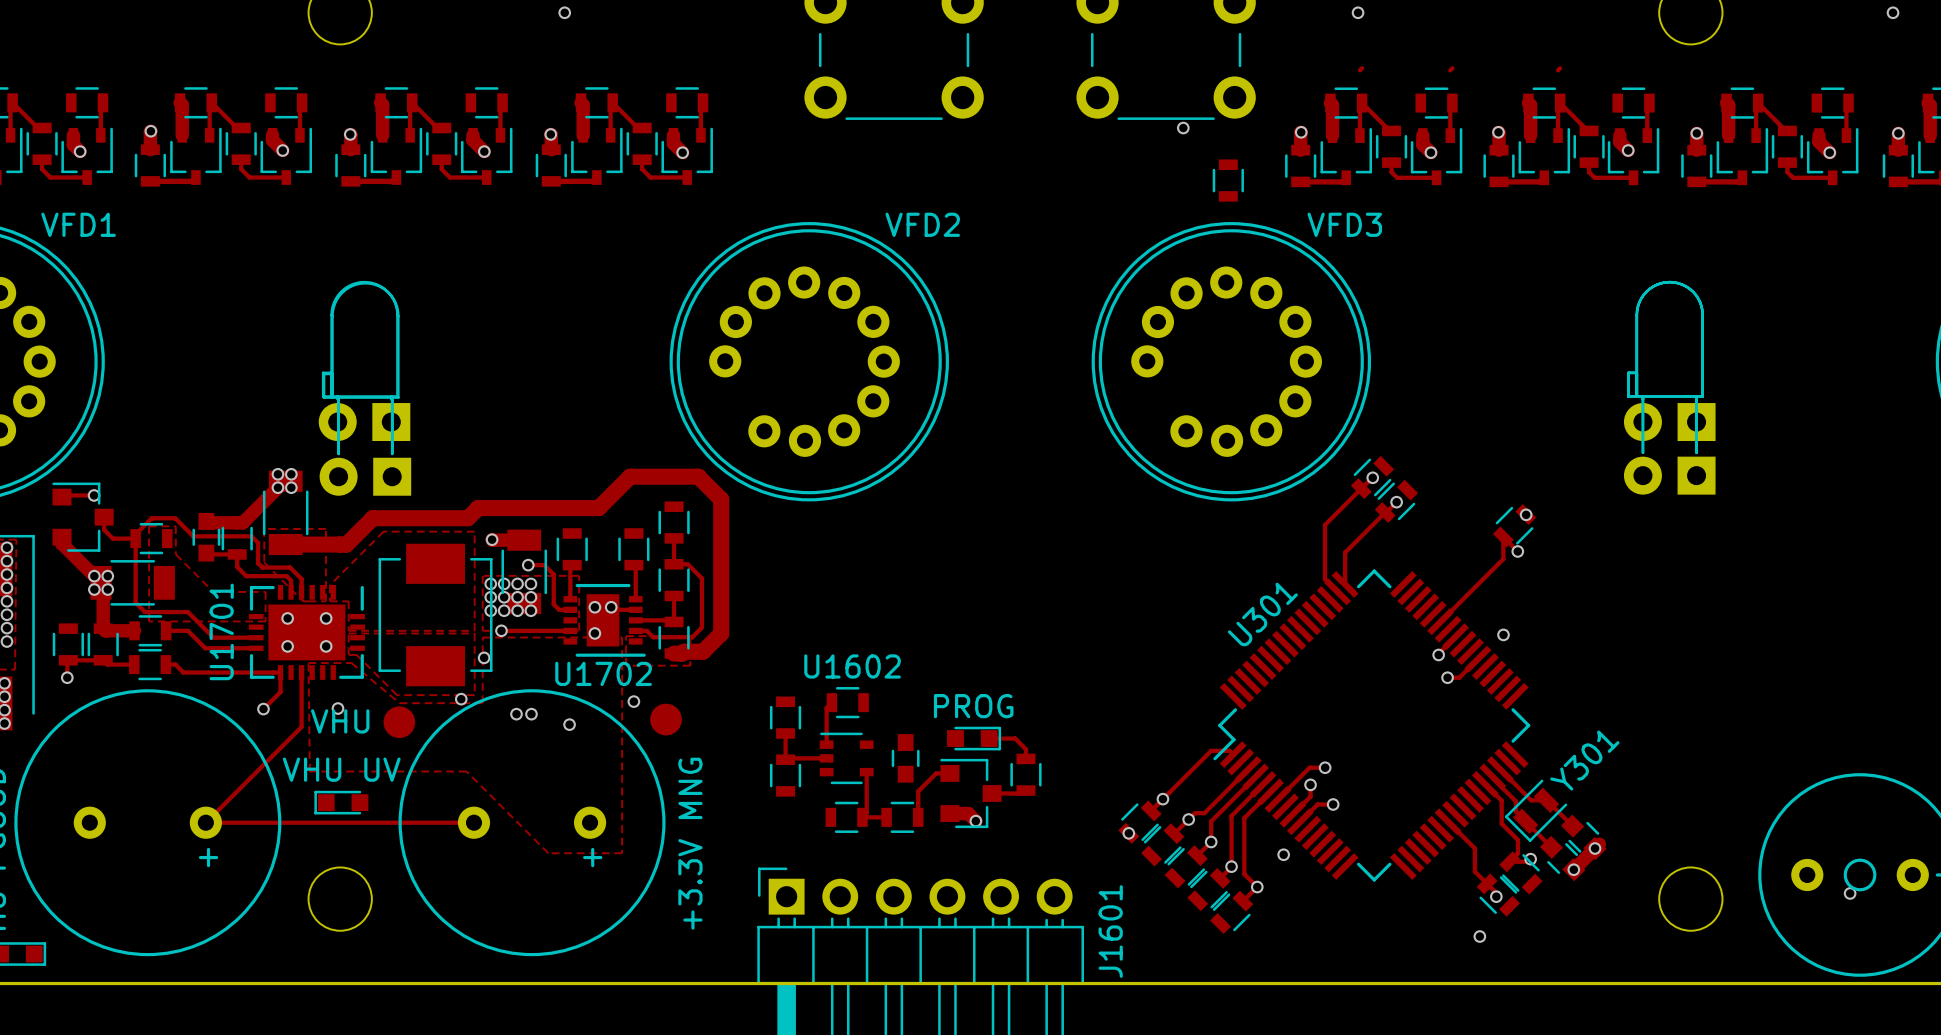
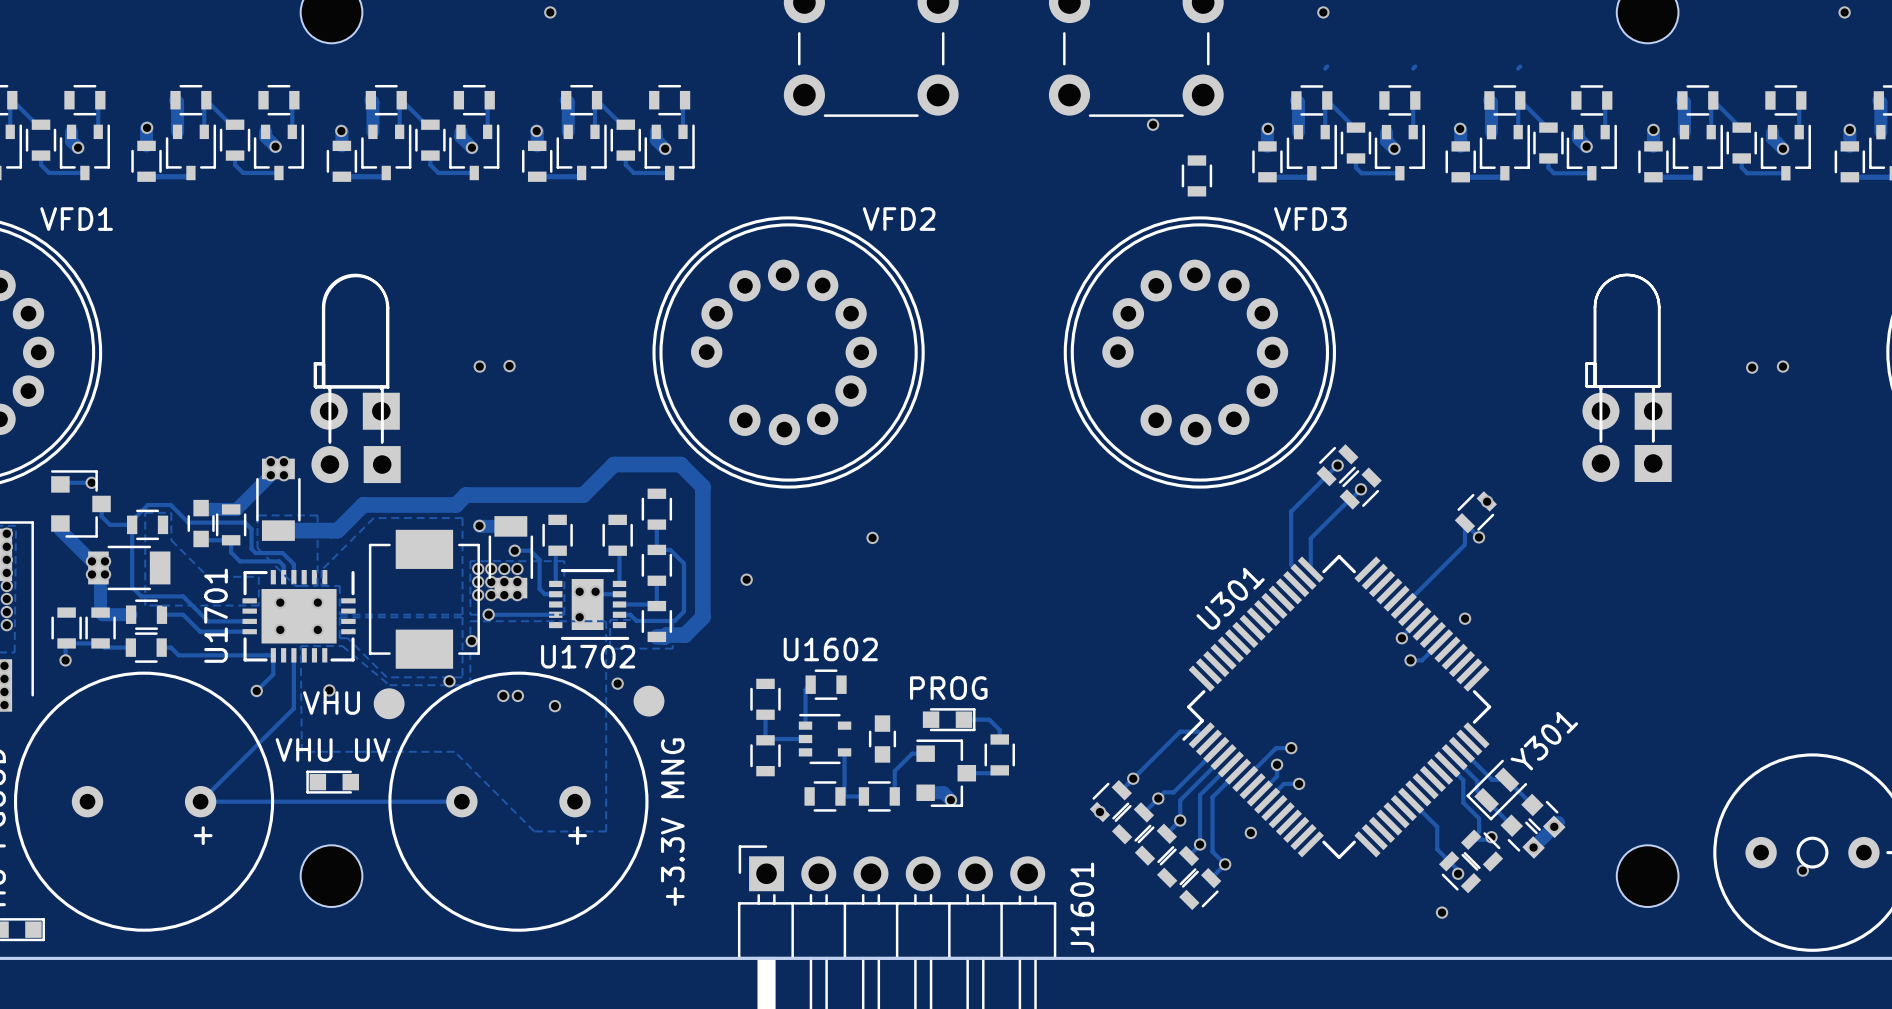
via: none -> (509, 366)
via: none -> (479, 366)
via: none -> (1782, 366)
via: none -> (1752, 367)
via: none -> (872, 537)
via: none -> (746, 579)

